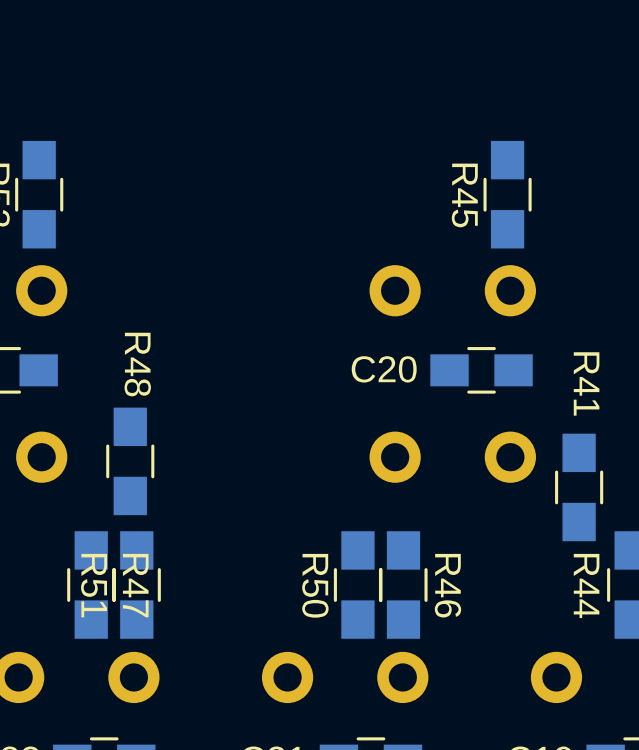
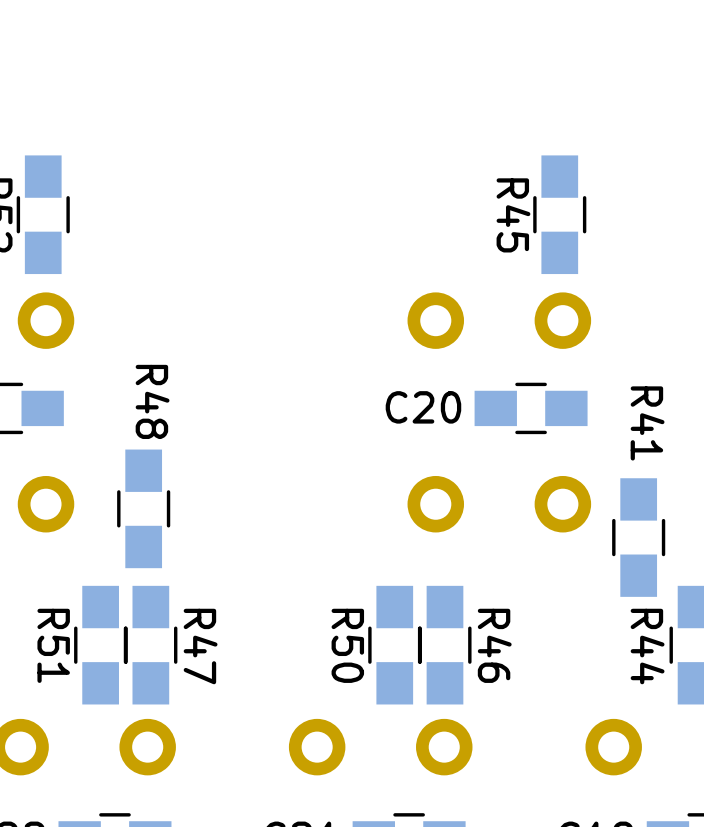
R51 name: R51 (94, 585) -> R47 (200, 646)
R47 name: R47 (135, 585) -> R51 (53, 645)

